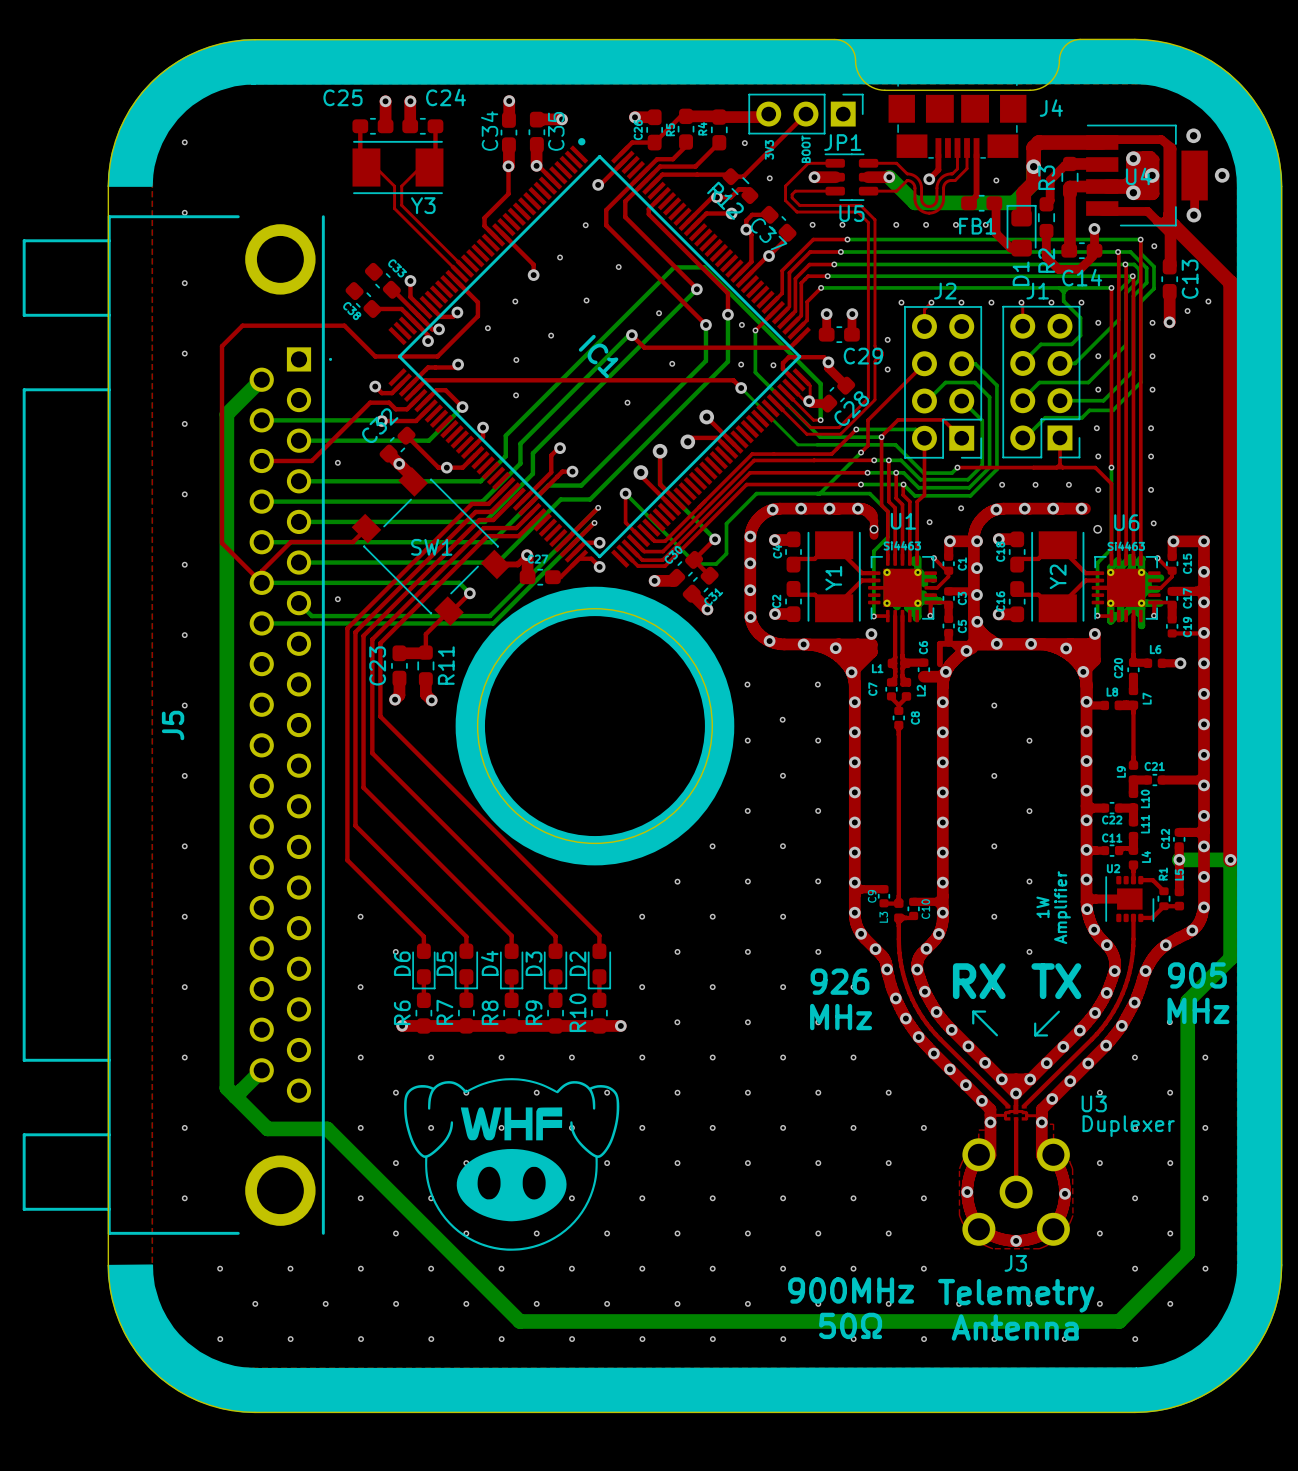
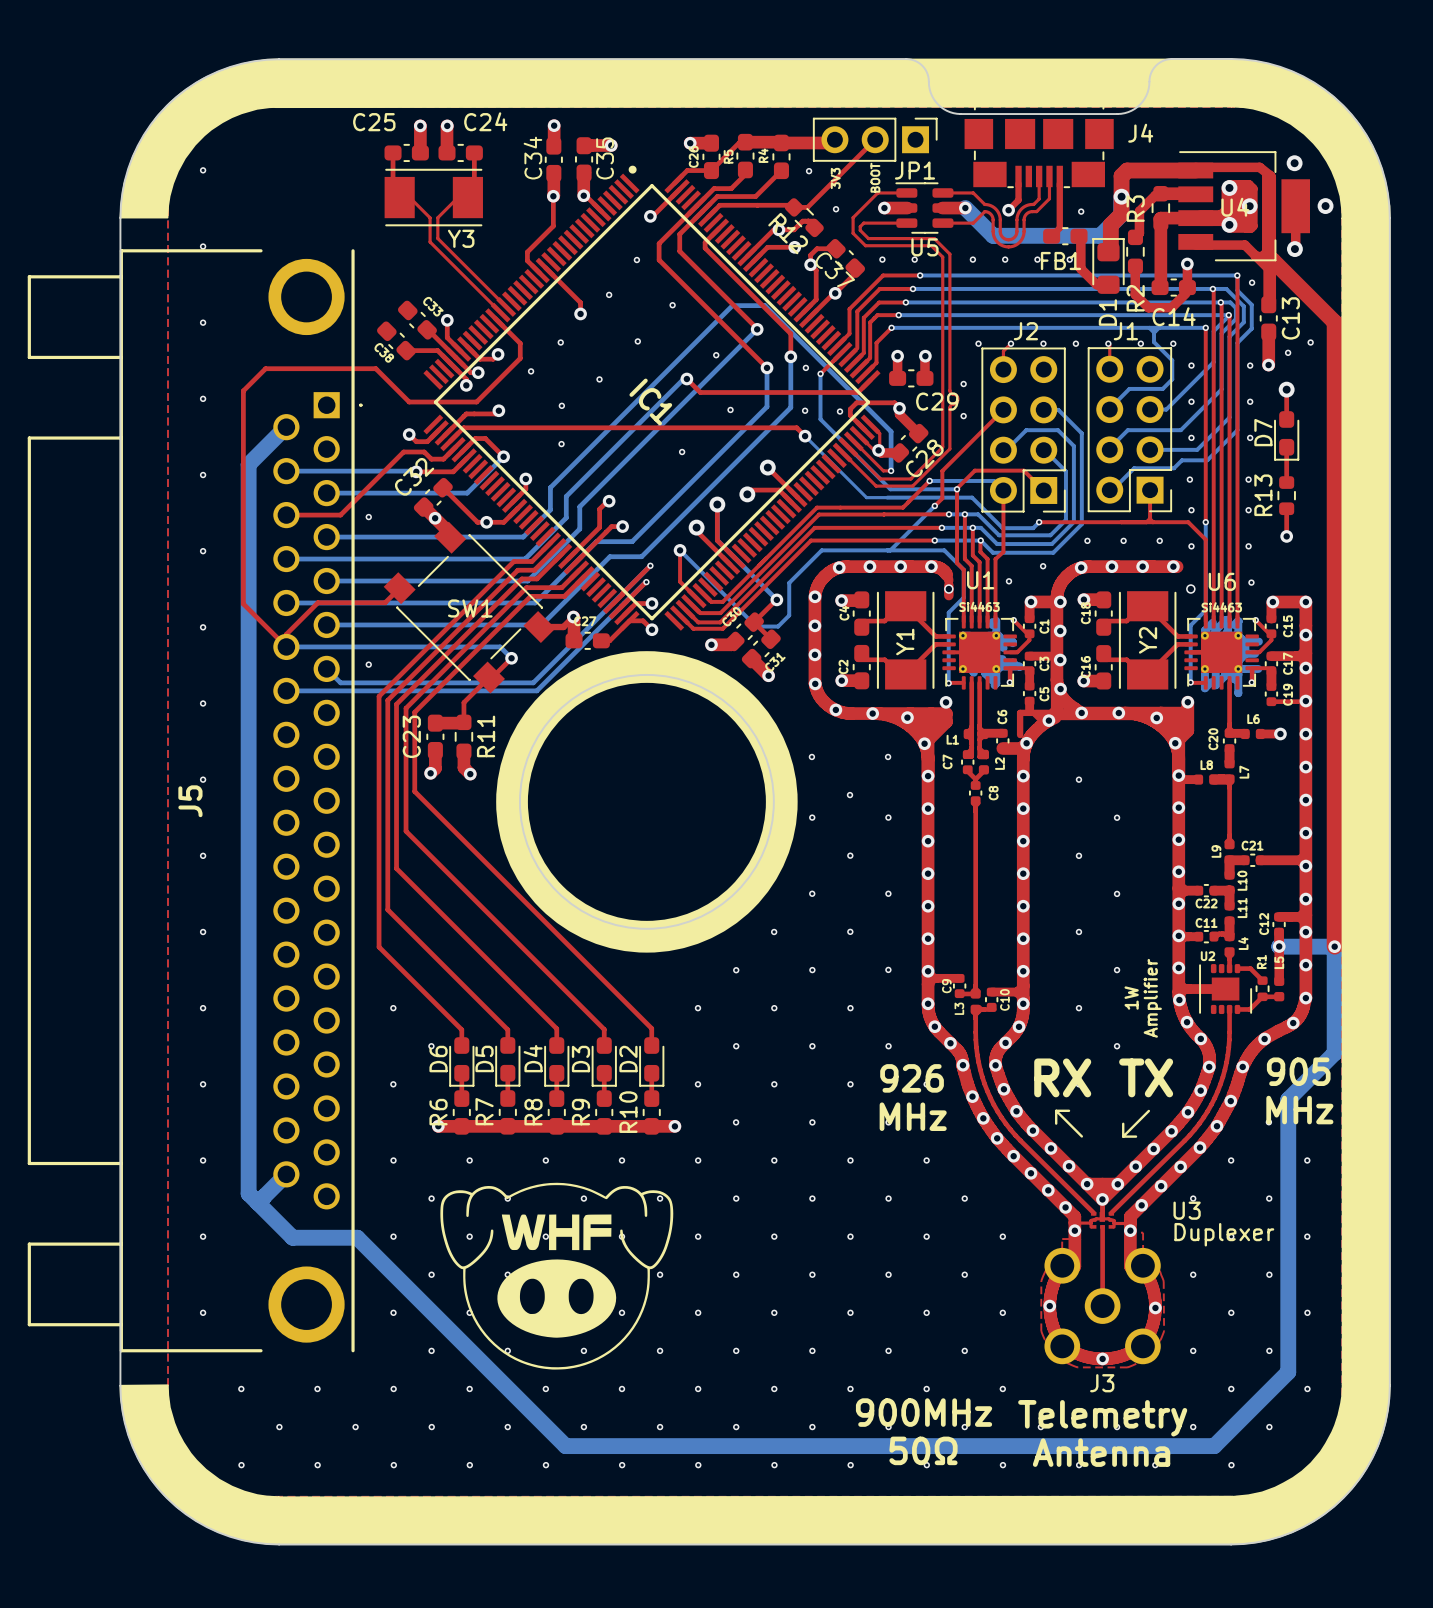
top track: none -> (1286, 389) (1286, 419)
via: none -> (1286, 389)
D7: none -> (1286, 435)
top track: none -> (1286, 447) (1286, 482)
R13: none -> (1286, 495)
top track: none -> (1286, 508) (1286, 536)
via: none -> (1286, 536)

